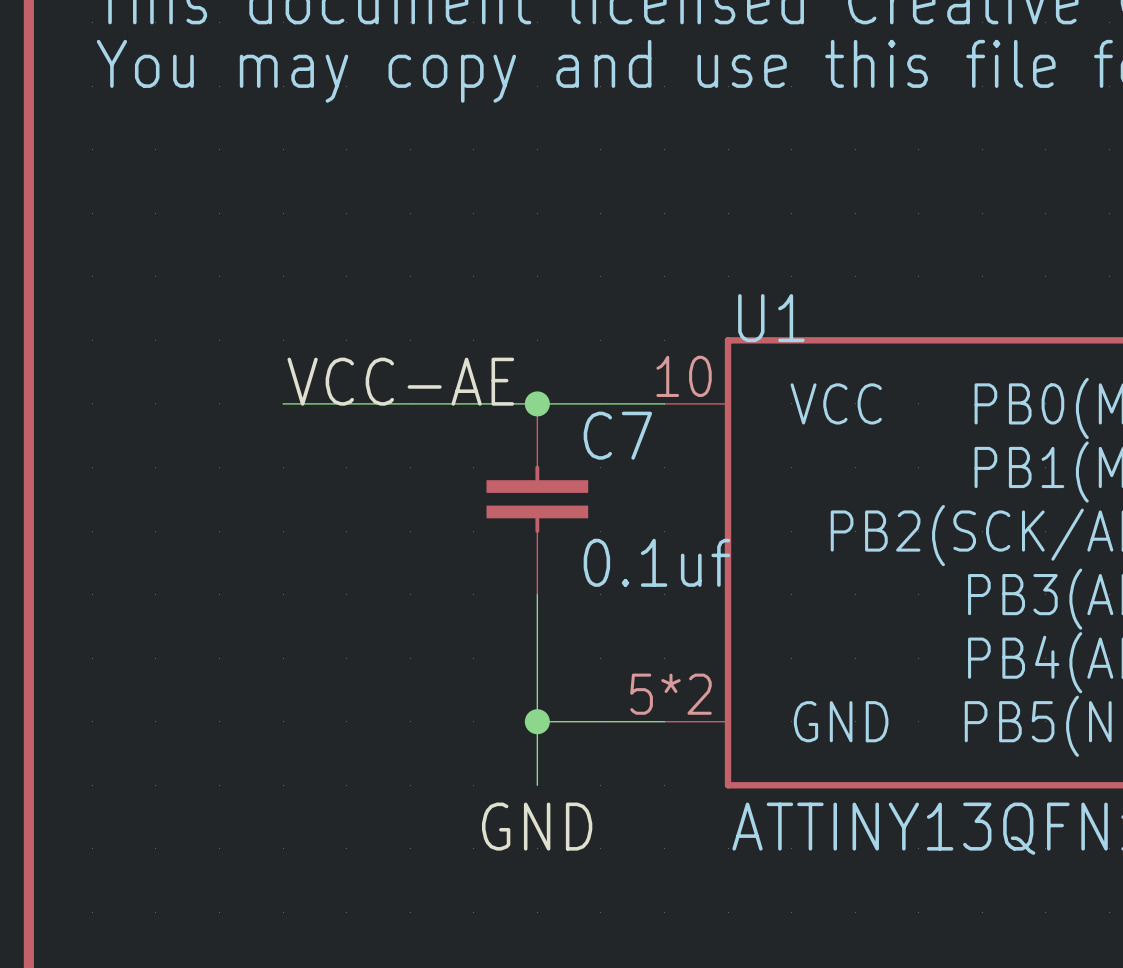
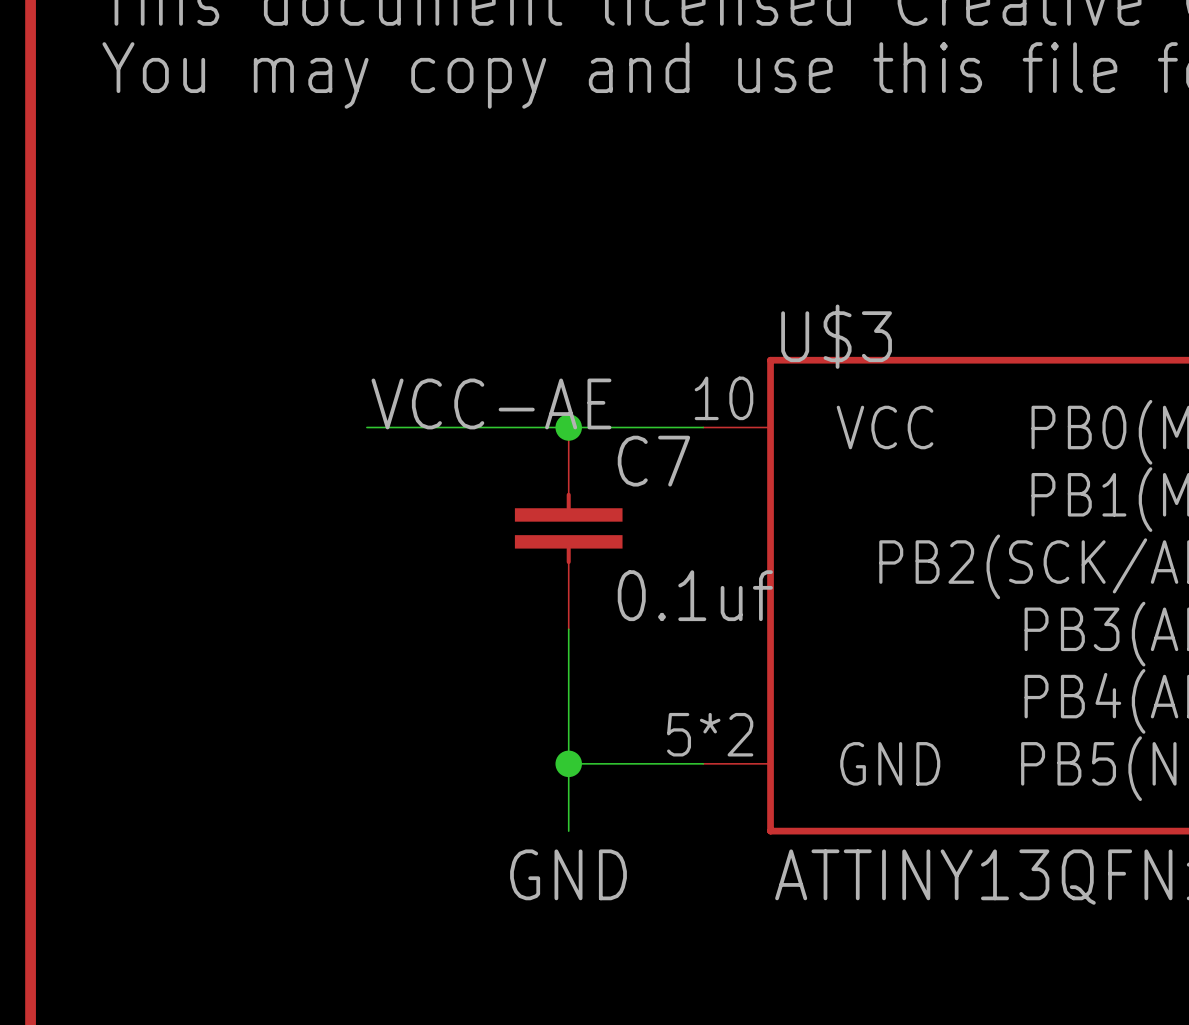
U1 name: U1 (771, 318) -> U$3 (836, 336)
label position: VCC-AE (400, 381) -> VCC-AE (491, 403)
wire: (283, 403) (346, 403) -> none

